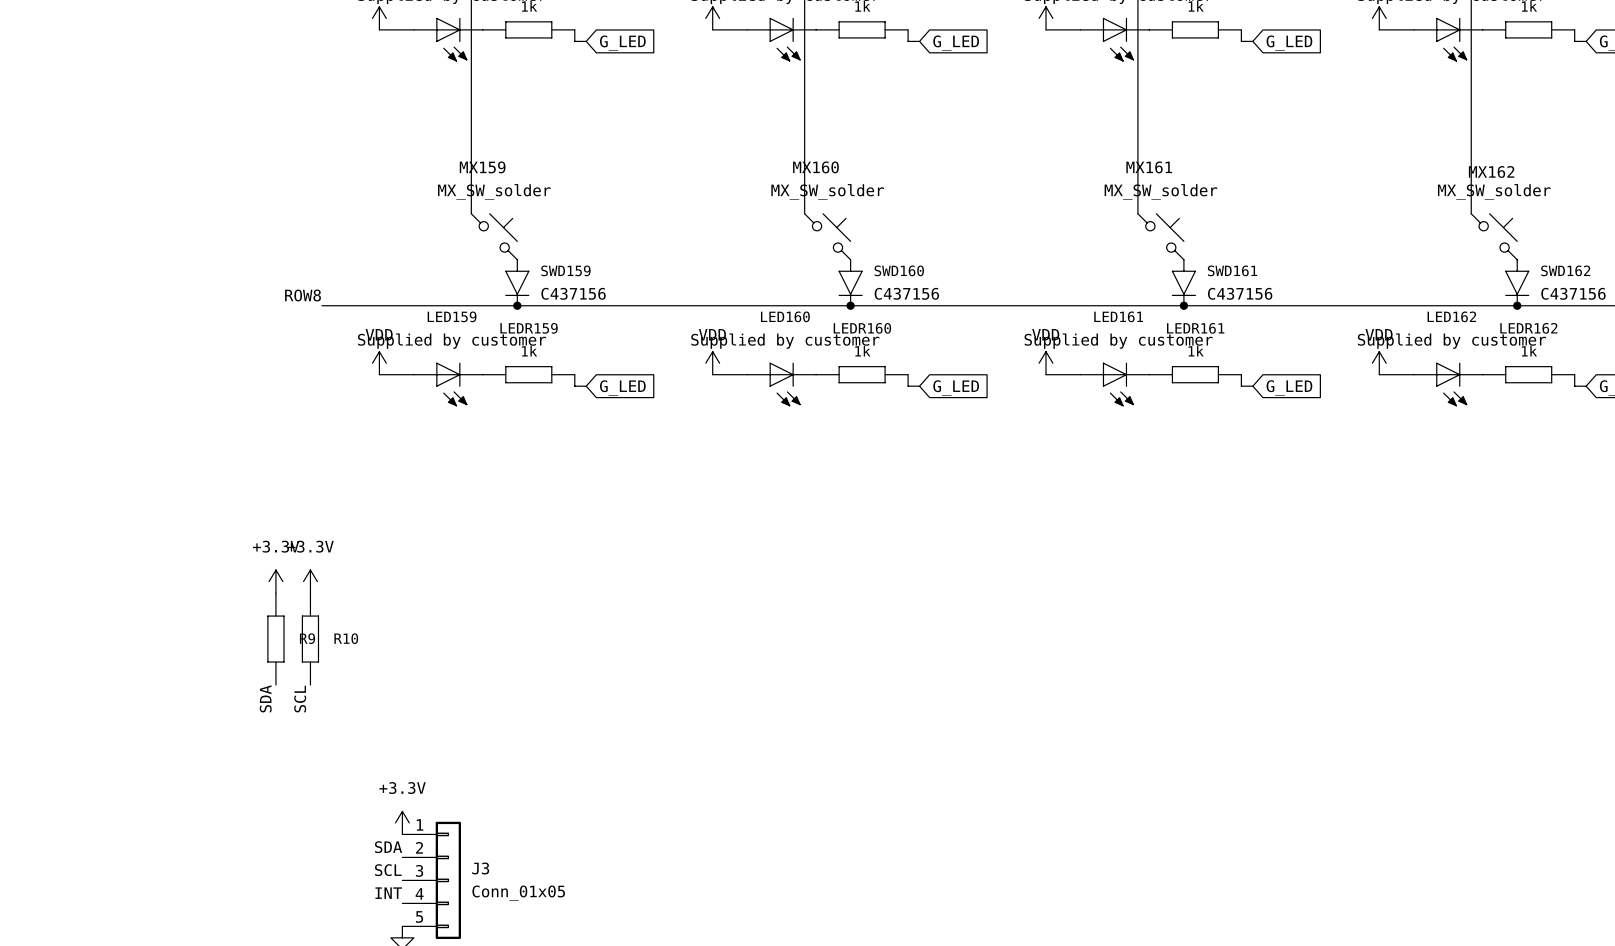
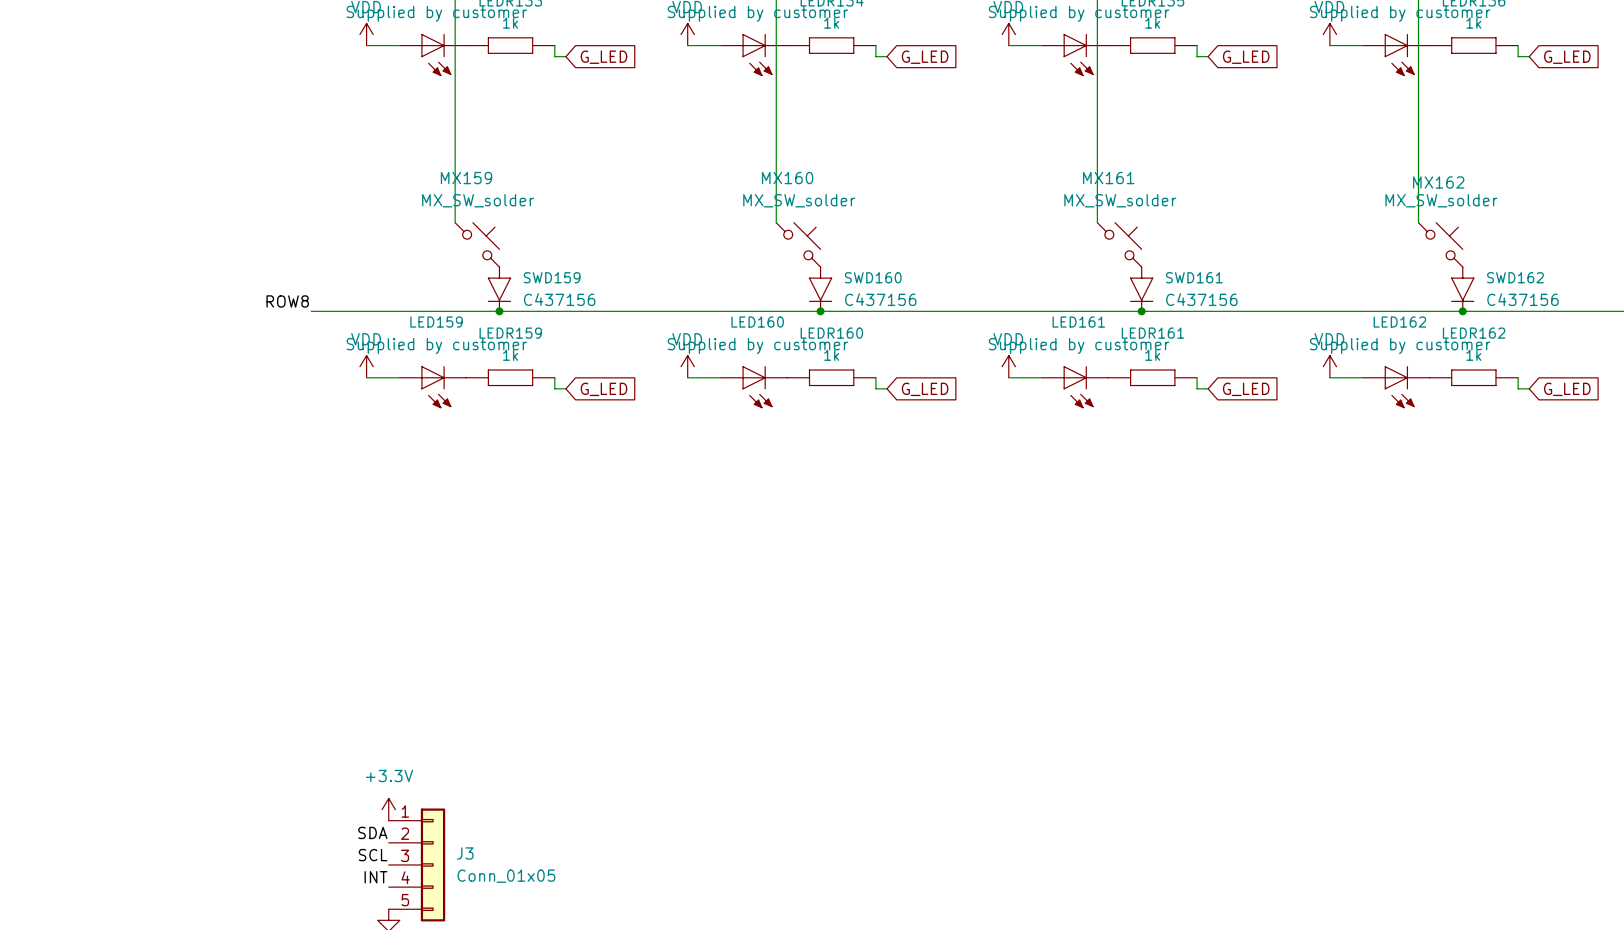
power symbol: +3.3V (275, 581) -> none
power symbol: +3.3V (310, 581) -> none
R9: (275, 639) -> none
R10: (310, 639) -> none
label: SDA (265, 698) -> none
label: SCL (300, 699) -> none

